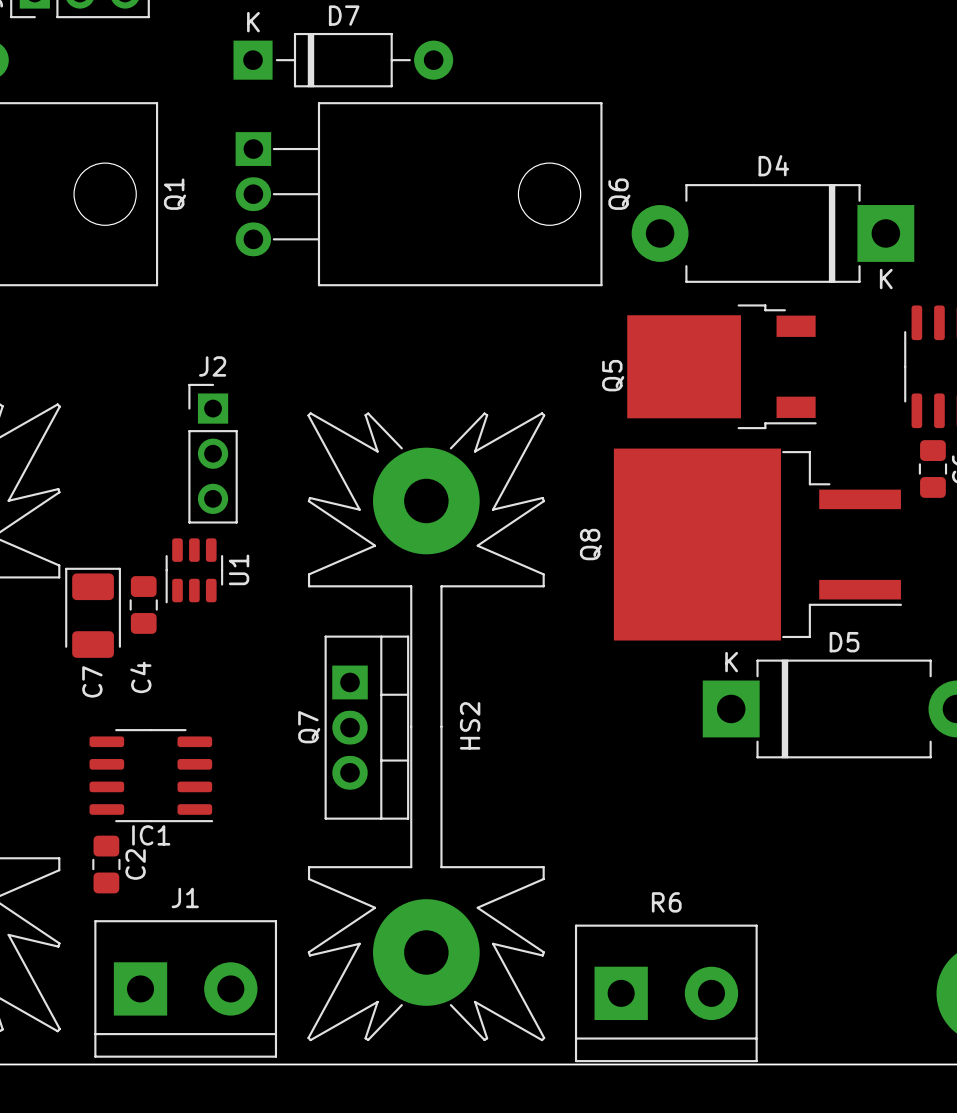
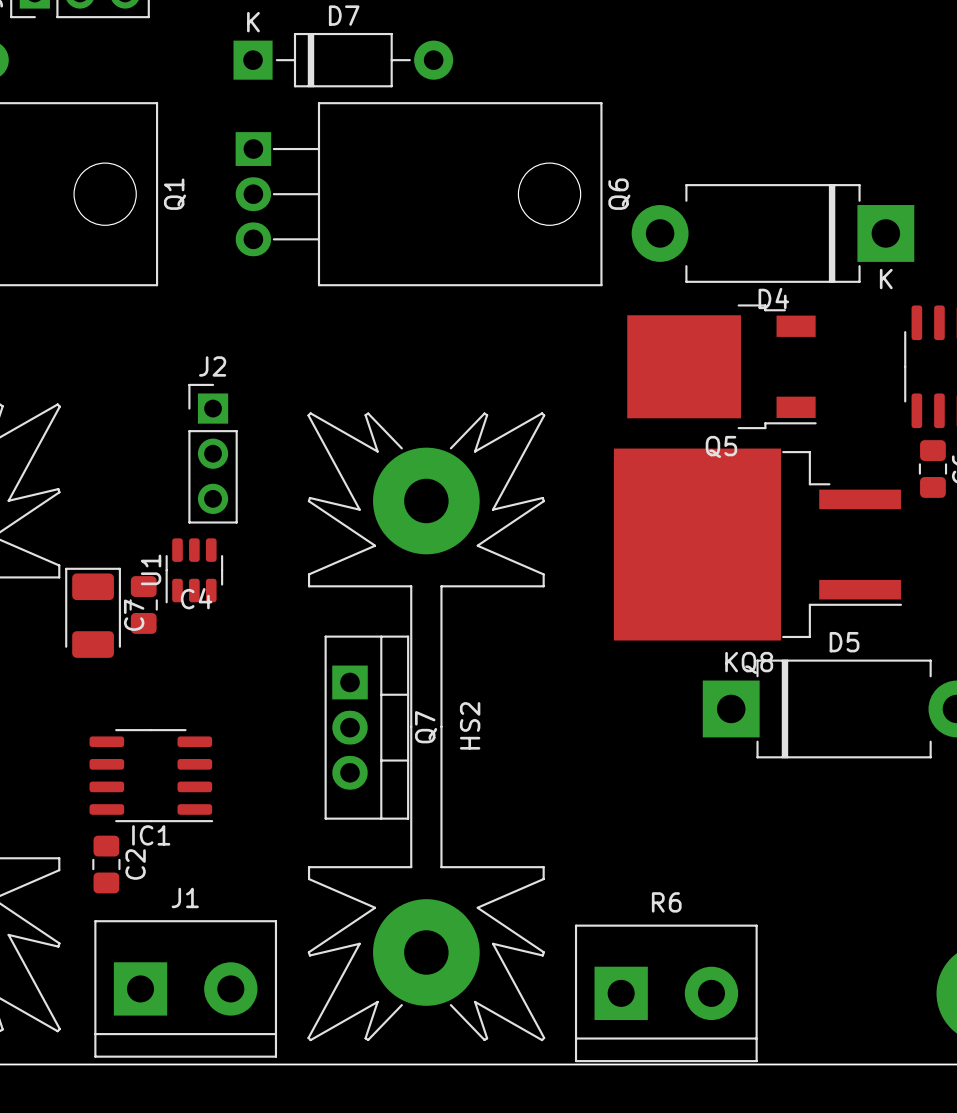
D4 name position: D4 (773, 165) -> D4 (773, 298)
Q5 name rotation: 0° (613, 375) -> 90° clockwise (721, 446)
Q5 name position: Q5 (613, 375) -> Q5 (721, 446)
Q8 name rotation: 0° (590, 544) -> 90° clockwise (757, 662)
Q8 name position: Q8 (590, 544) -> Q8 (757, 662)
U1 name position: U1 (239, 569) -> U1 (151, 569)
C4 name rotation: 0° (140, 677) -> 90° clockwise (196, 598)
C4 name position: C4 (140, 677) -> C4 (196, 598)
C7 name position: C7 (92, 681) -> C7 (134, 615)
Q7 name position: Q7 (309, 727) -> Q7 (426, 727)

